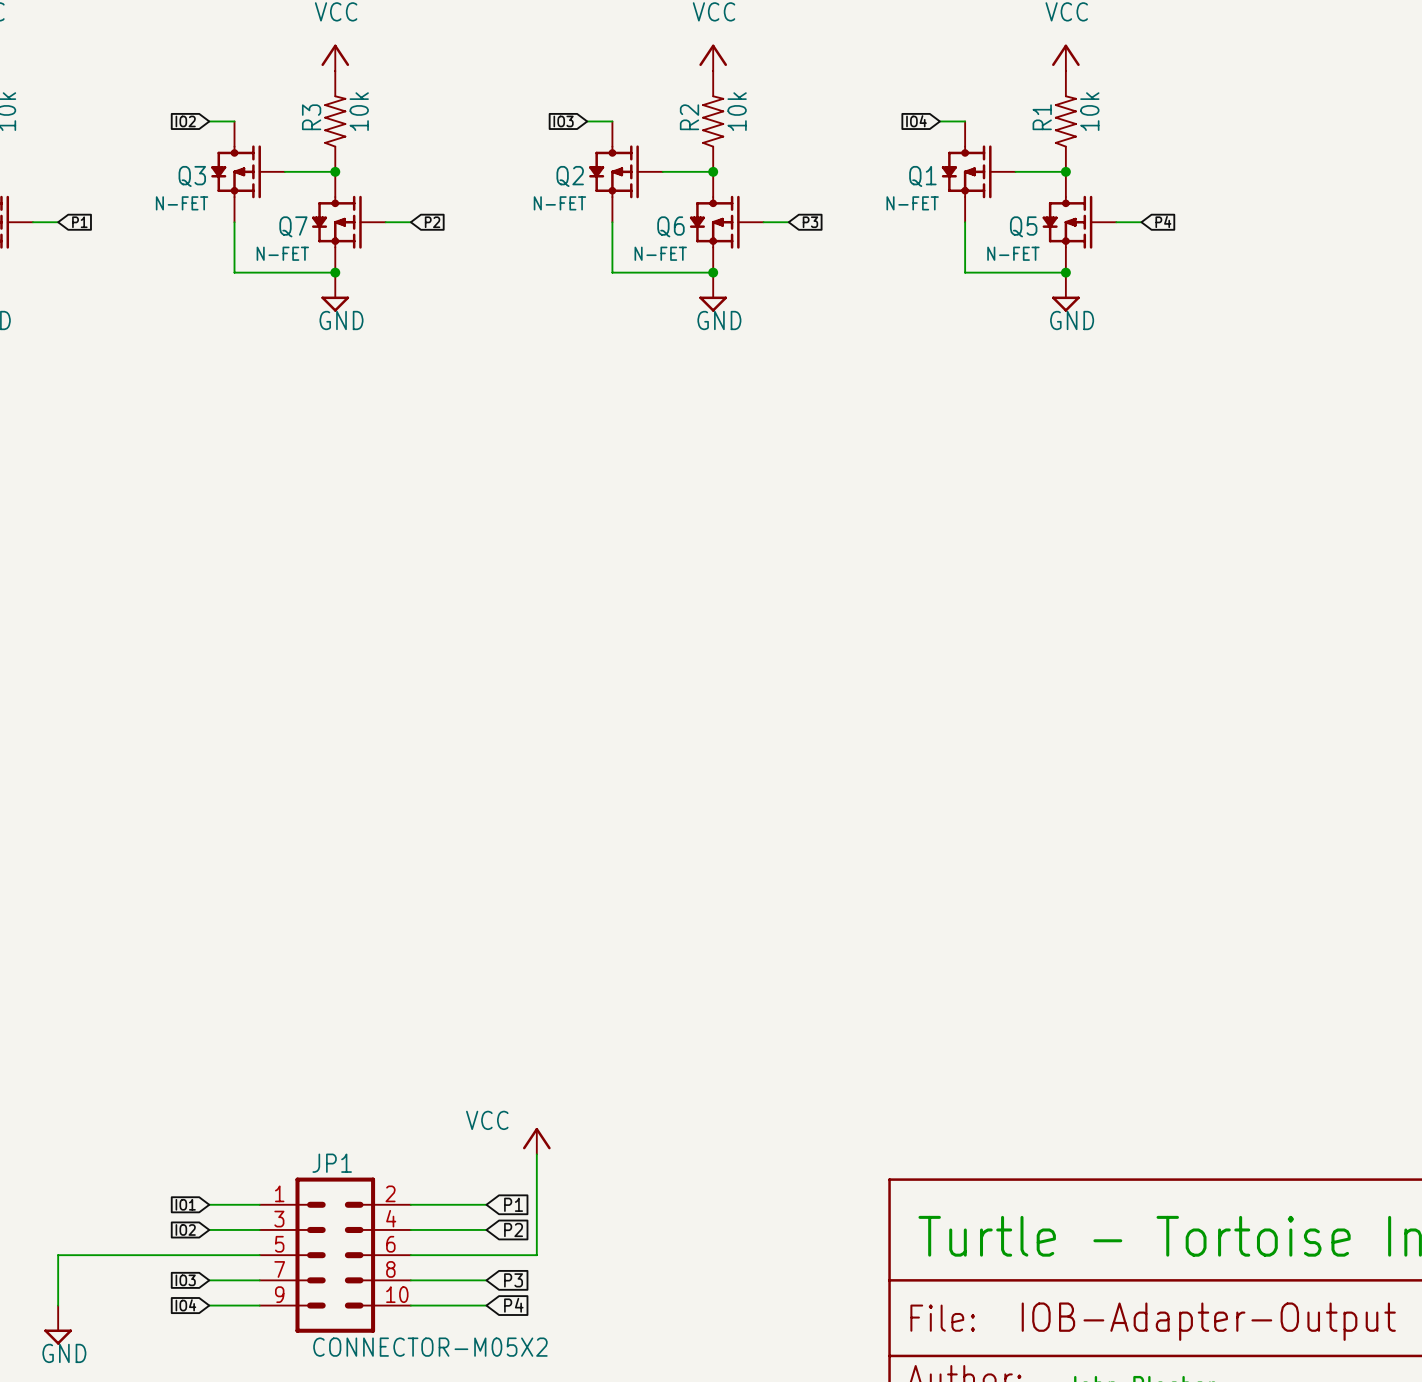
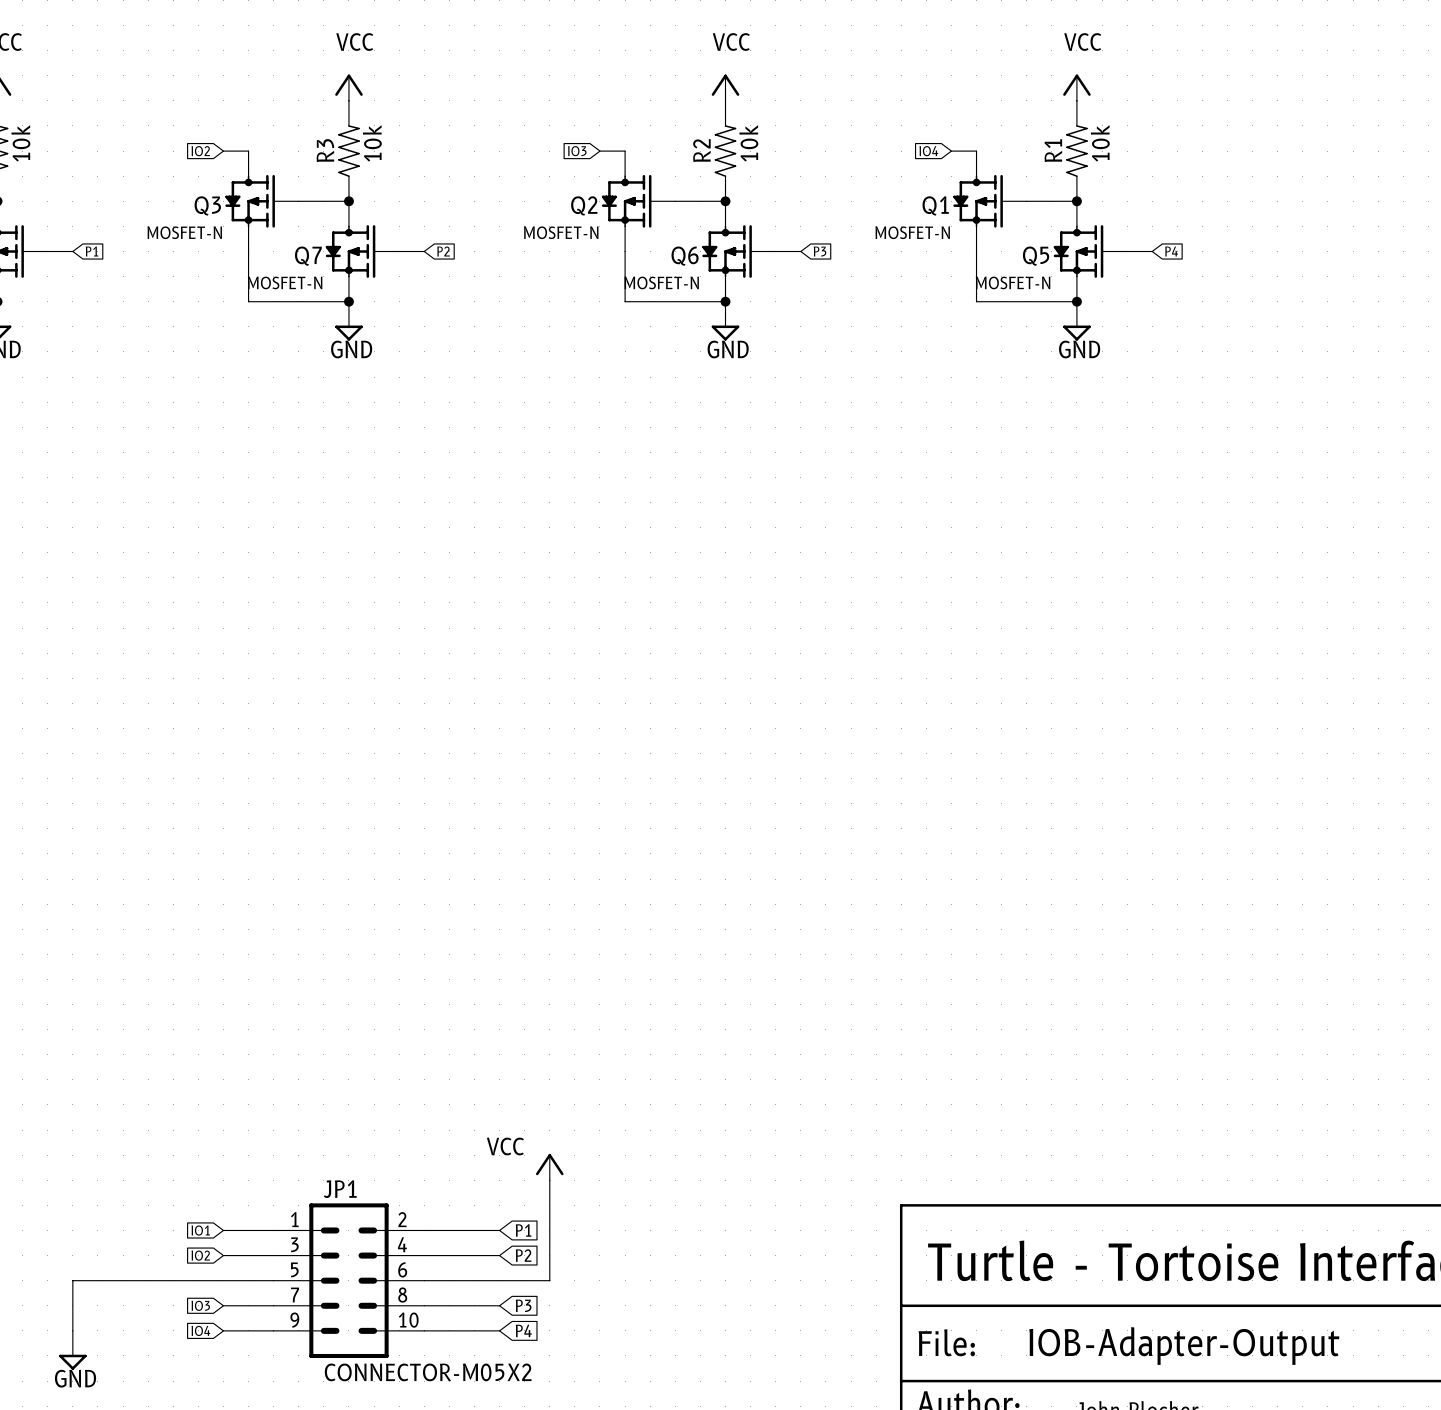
Q3 value: N-FET (182, 203) -> MOSFET-N (184, 232)
Q2 value: N-FET (559, 203) -> MOSFET-N (561, 232)
Q1 value: N-FET (912, 203) -> MOSFET-N (912, 232)
Q7 value: N-FET (282, 253) -> MOSFET-N (285, 282)
Q6 value: N-FET (660, 253) -> MOSFET-N (661, 282)
Q5 value: N-FET (1013, 253) -> MOSFET-N (1013, 282)

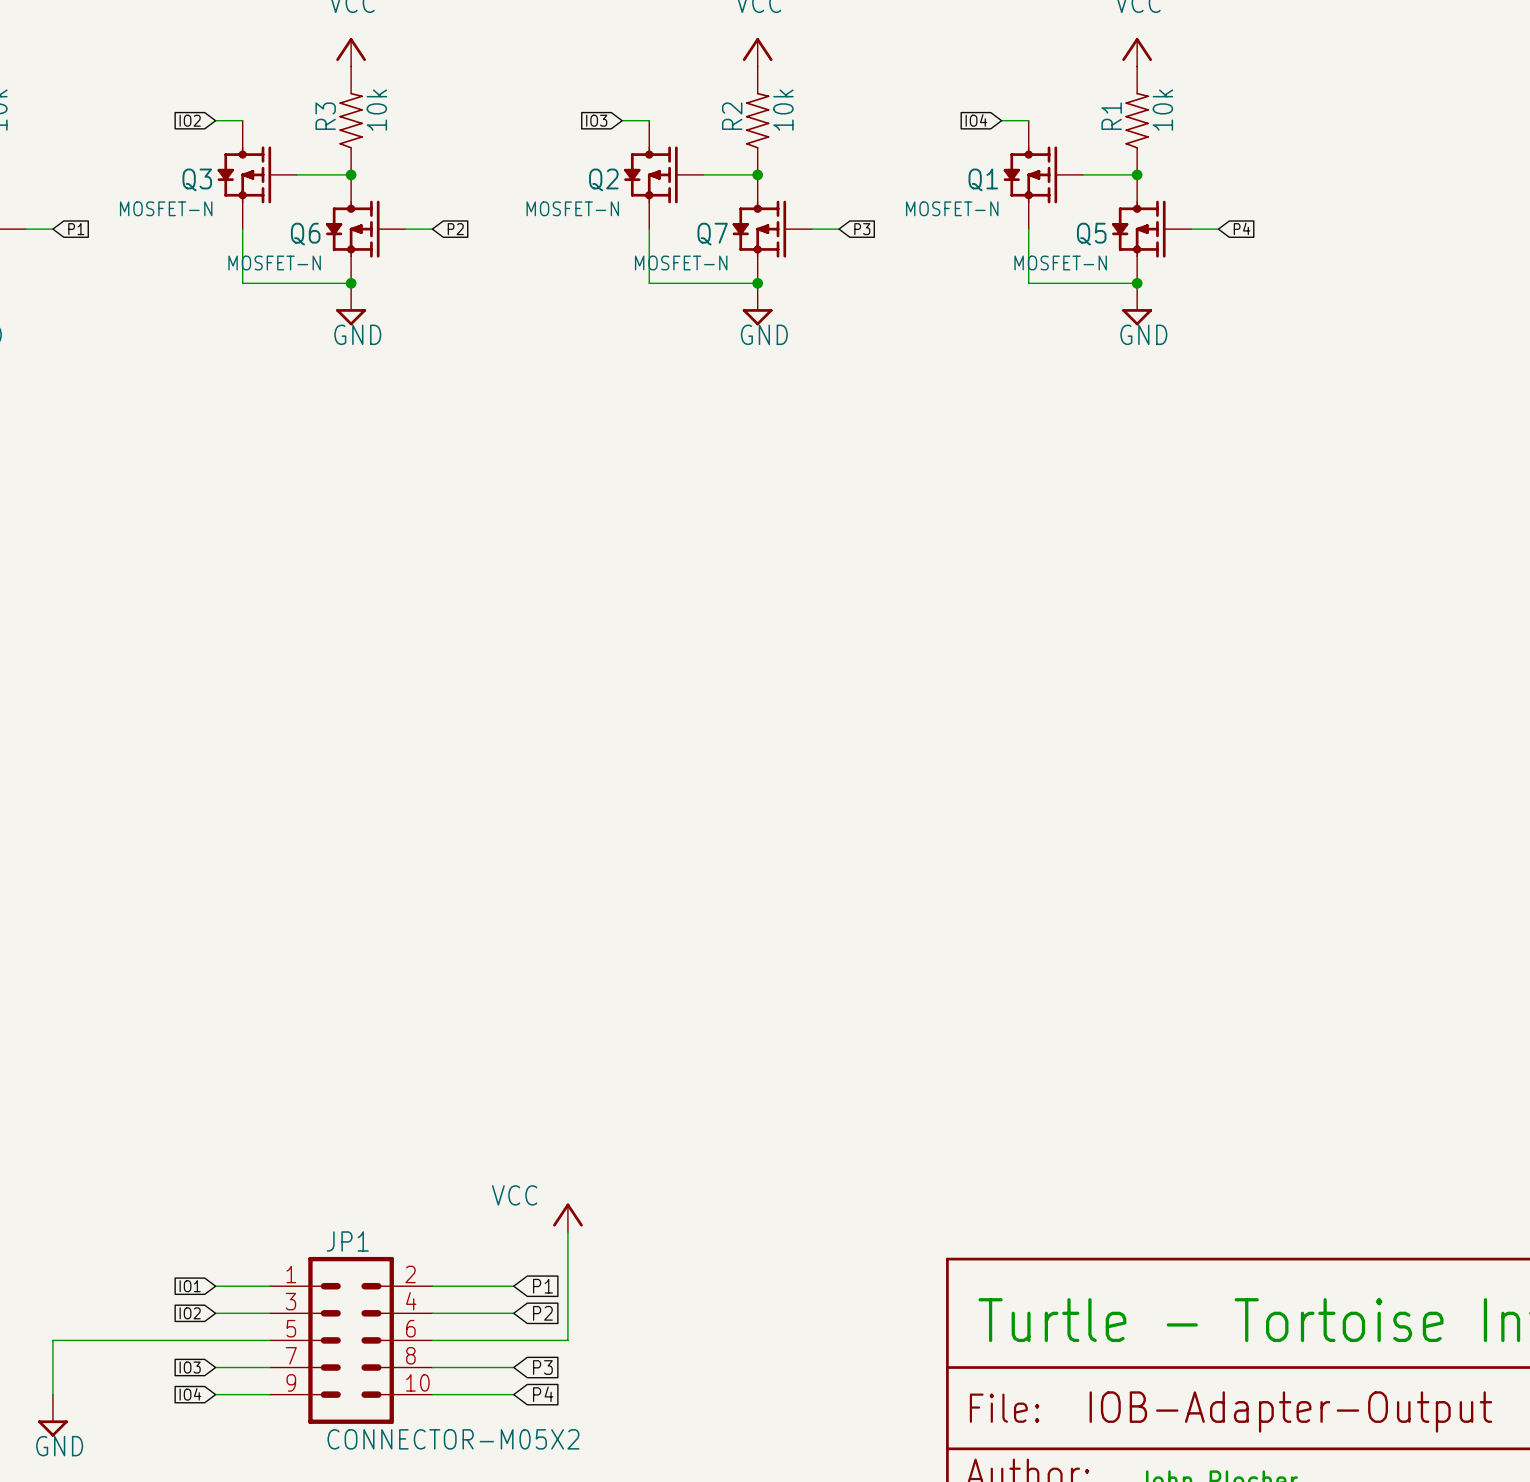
Q7 name: Q7 (308, 256) -> Q6 (305, 234)
Q6 name: Q6 (685, 256) -> Q7 (712, 234)

